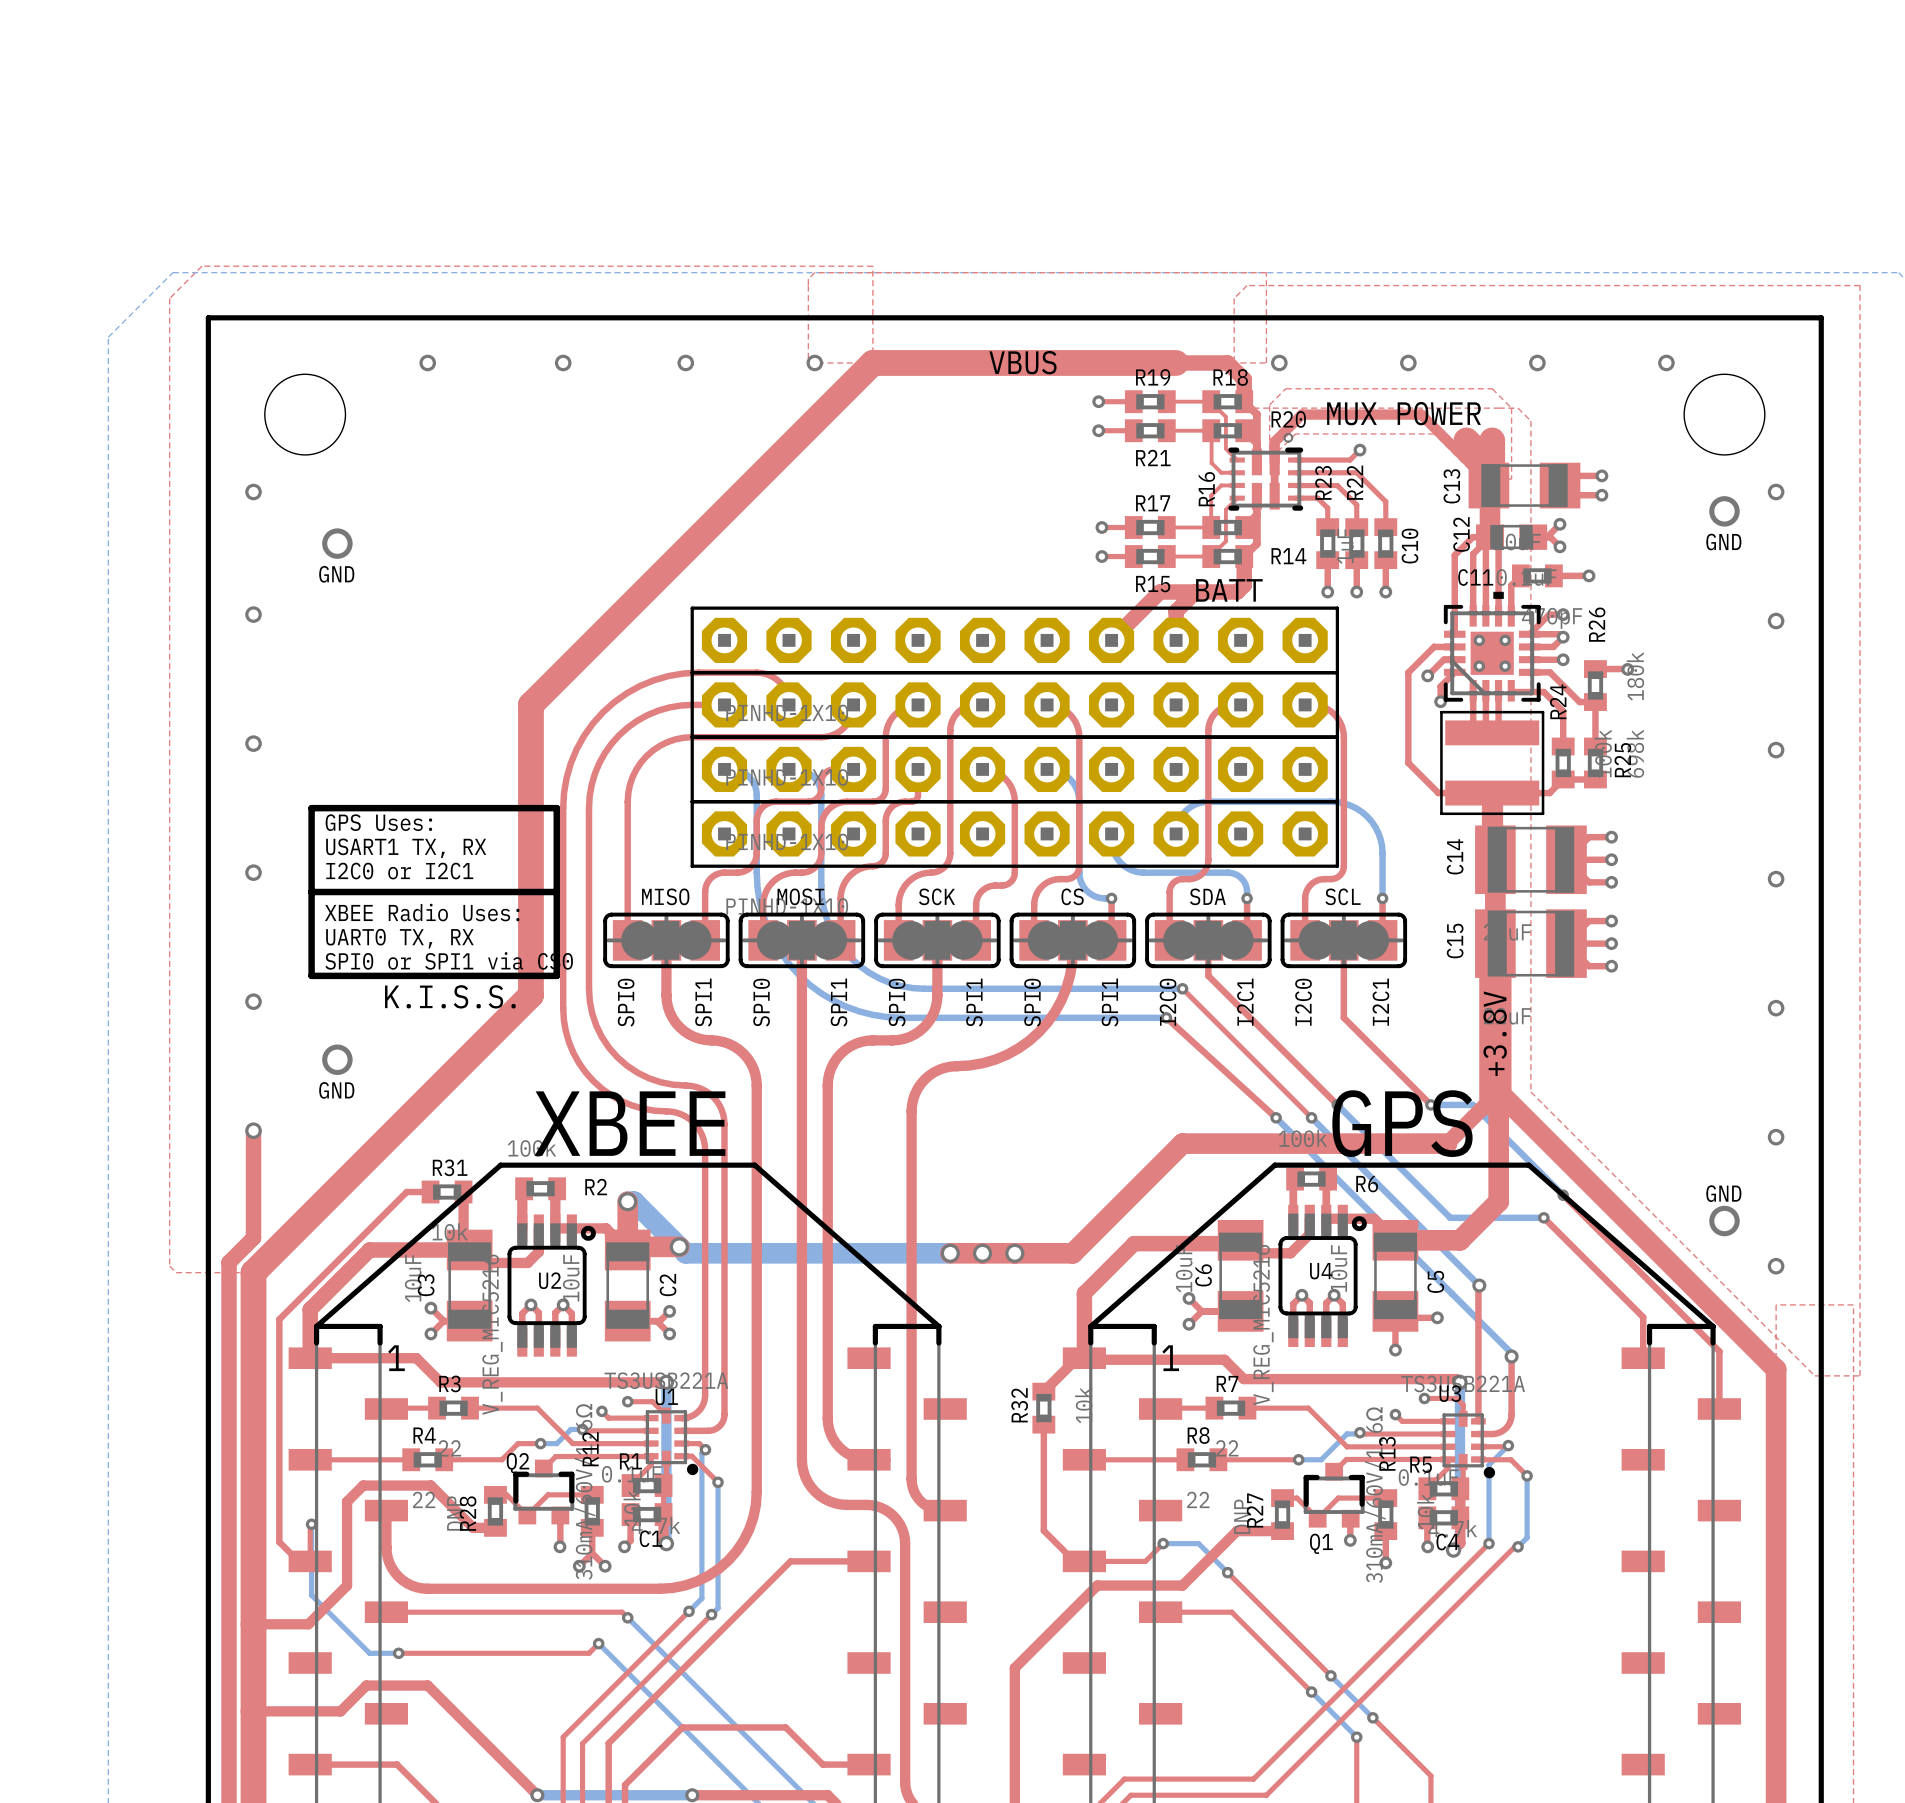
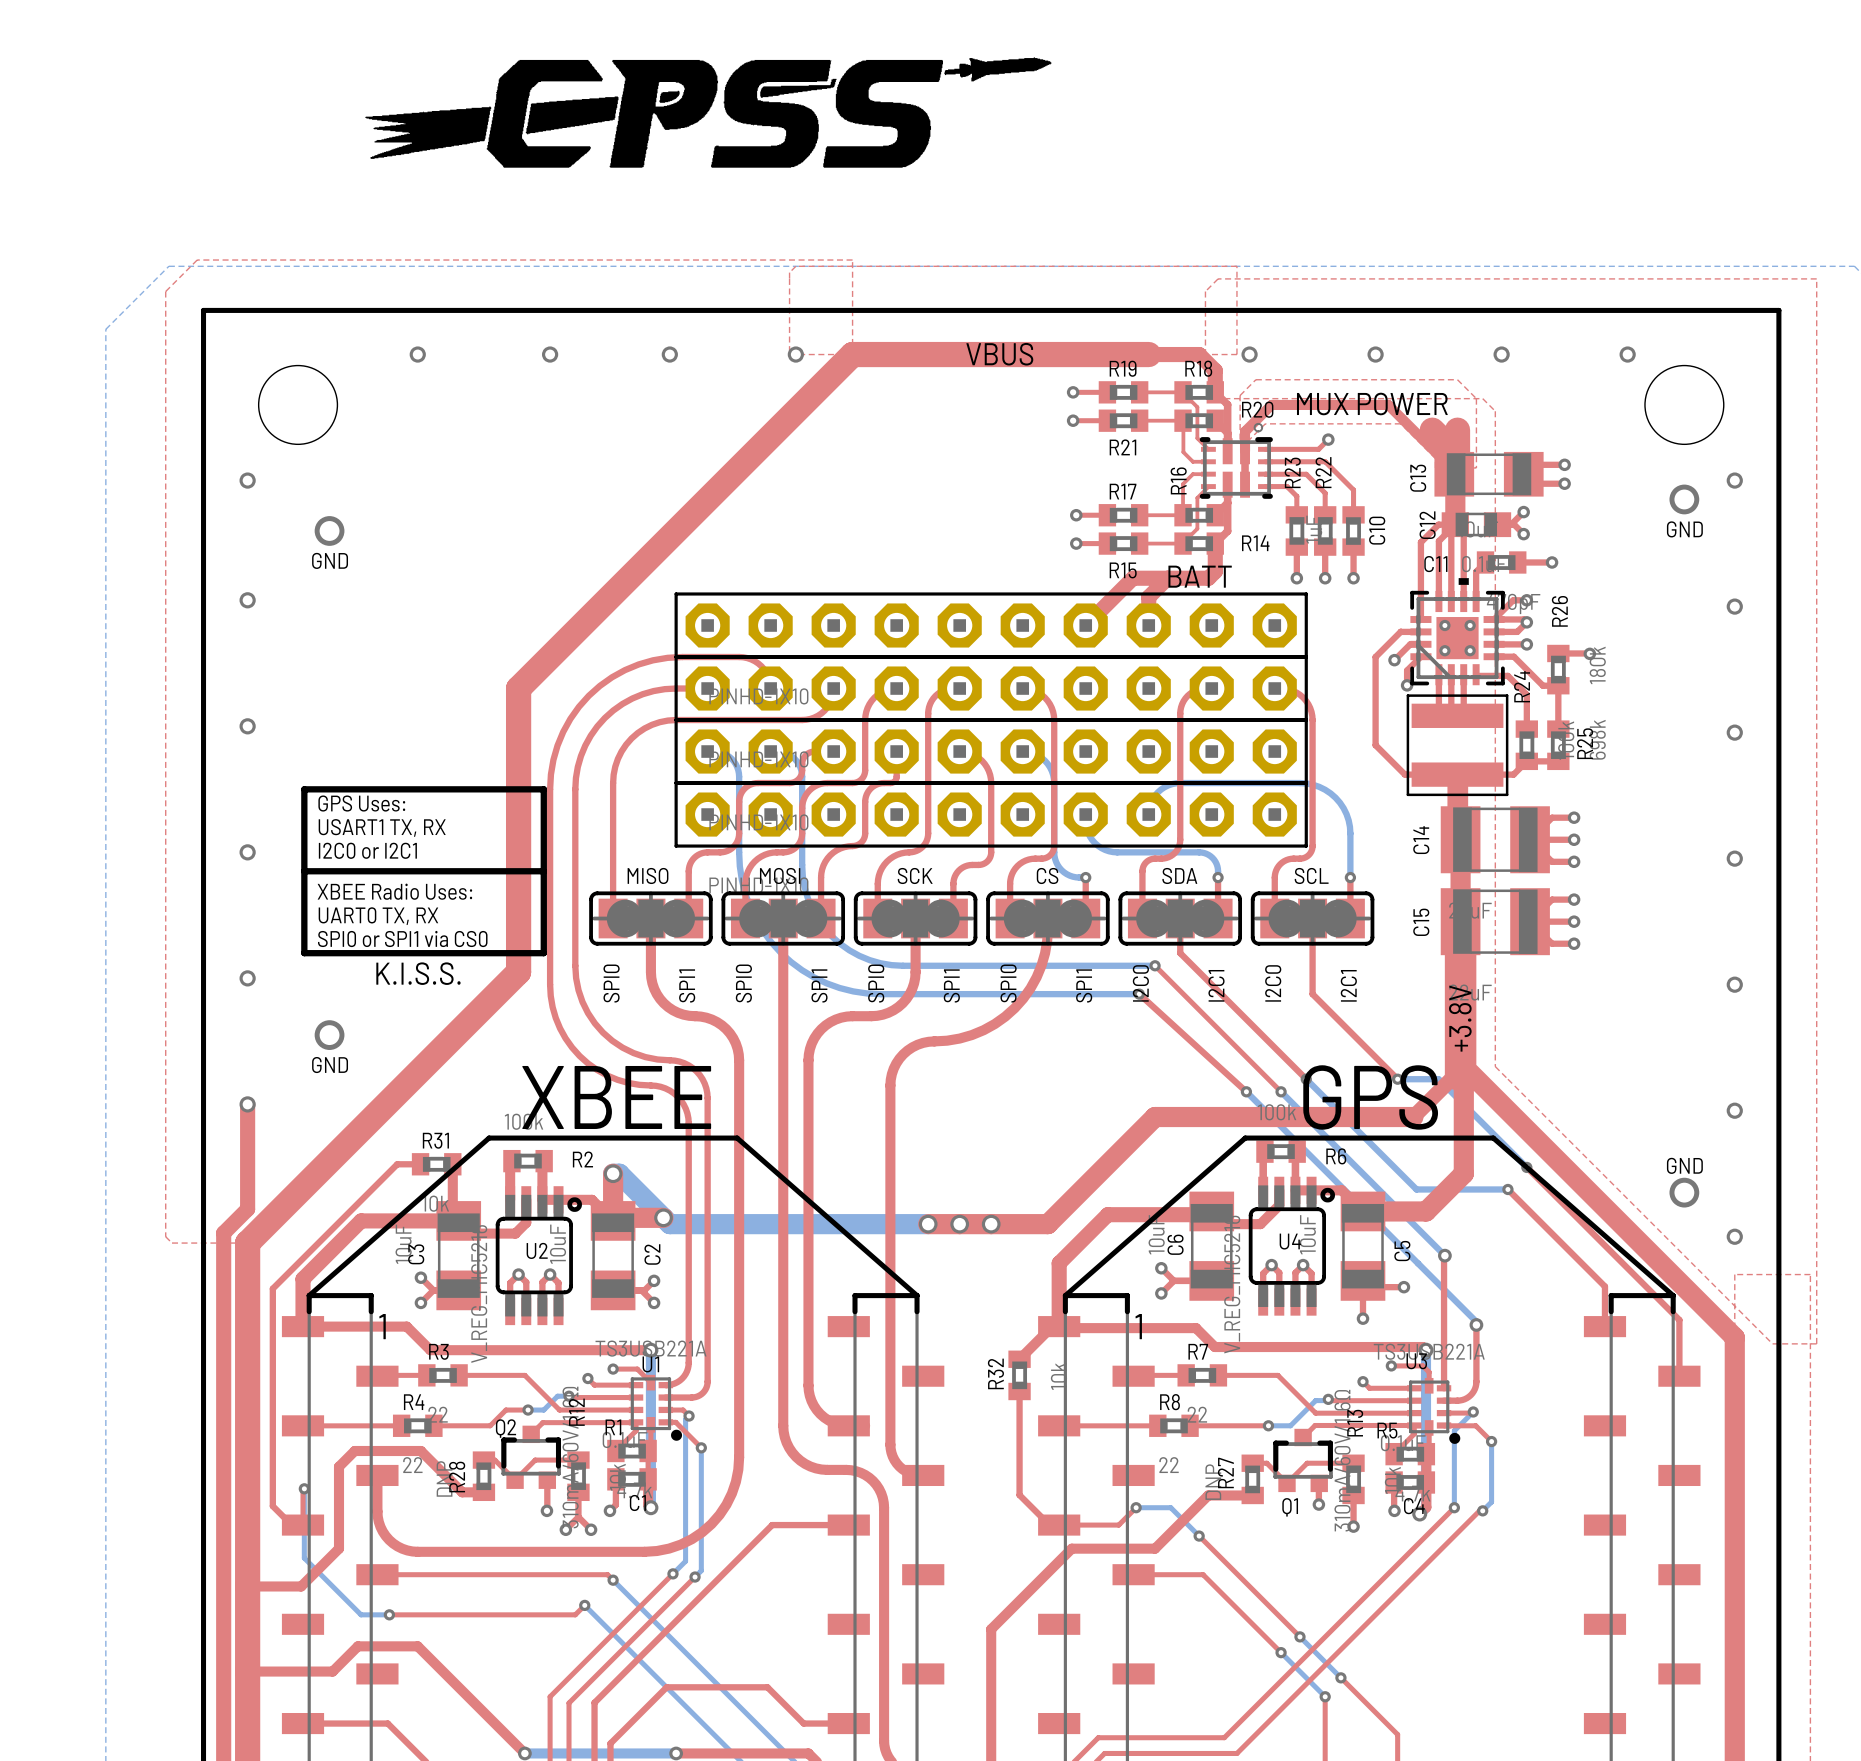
drawing: none -> [365, 57, 1052, 168]

